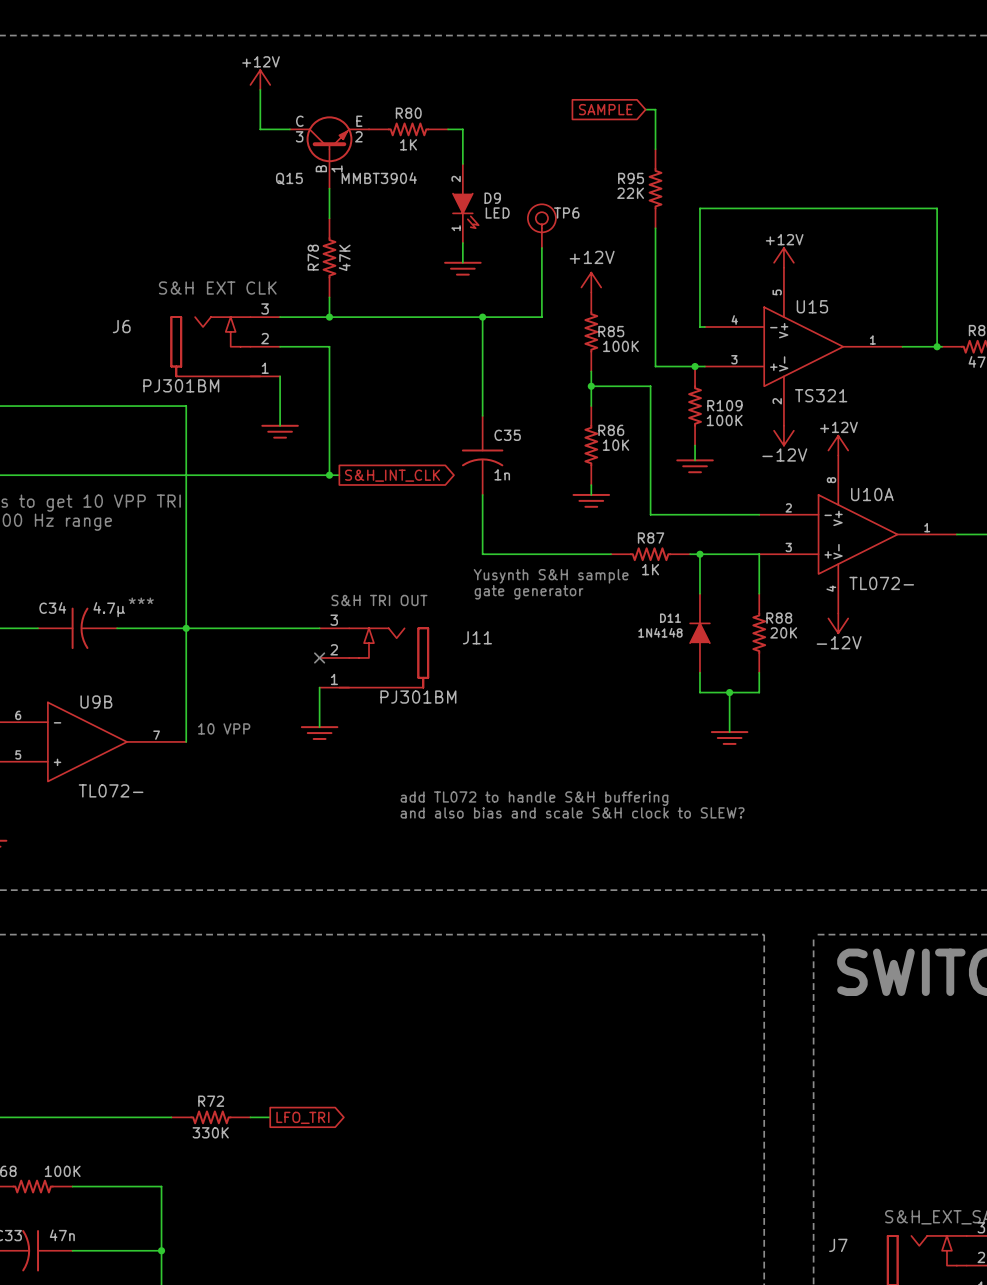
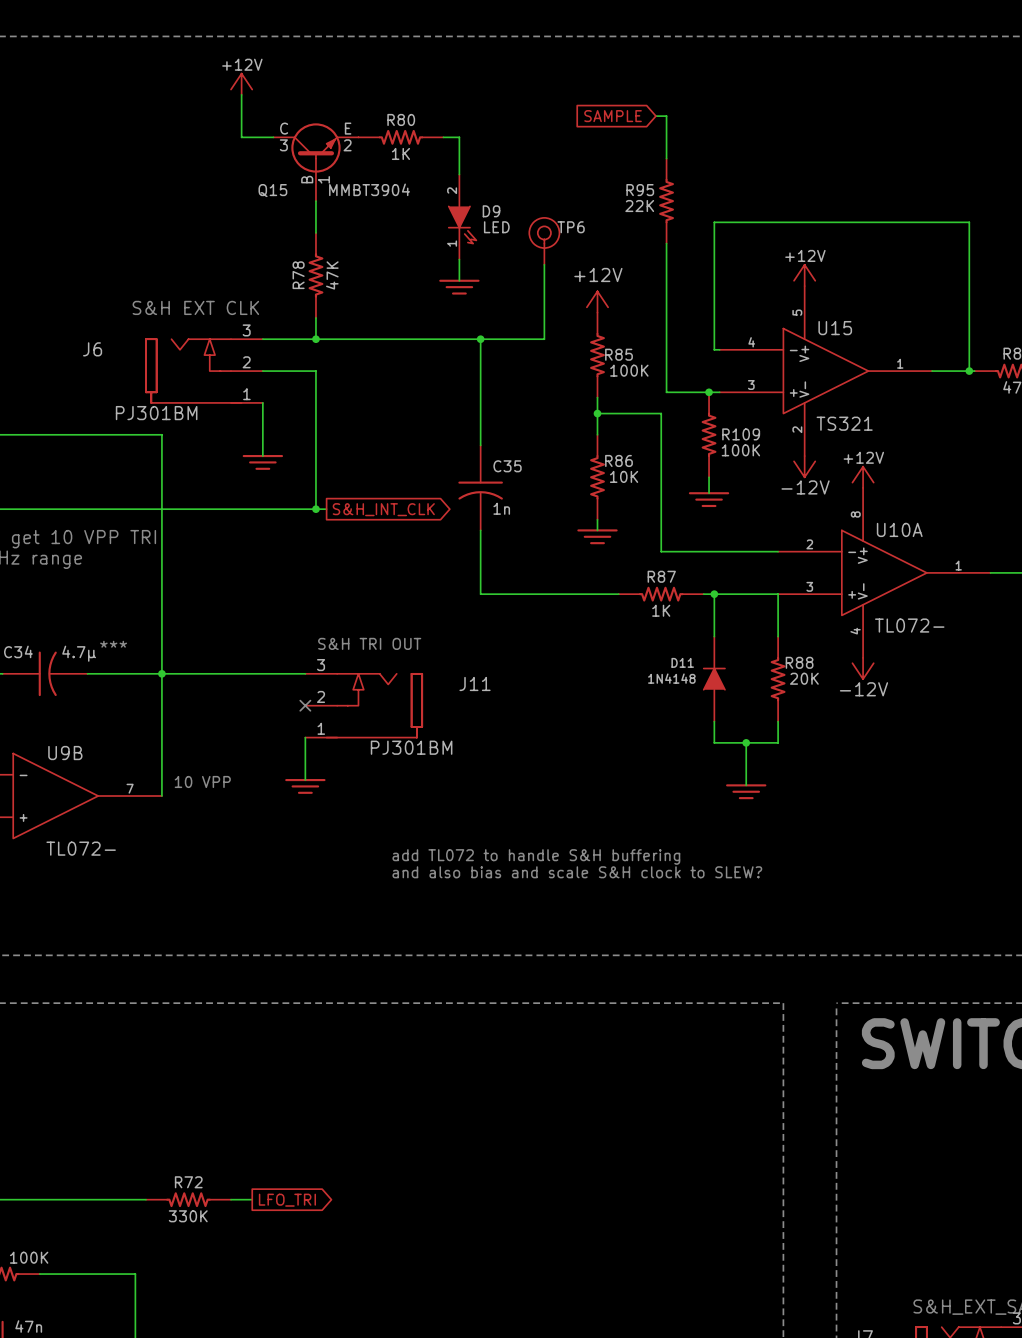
text: Yusynth S&H sample (551, 576) -> none
text: gate generator (529, 592) -> none

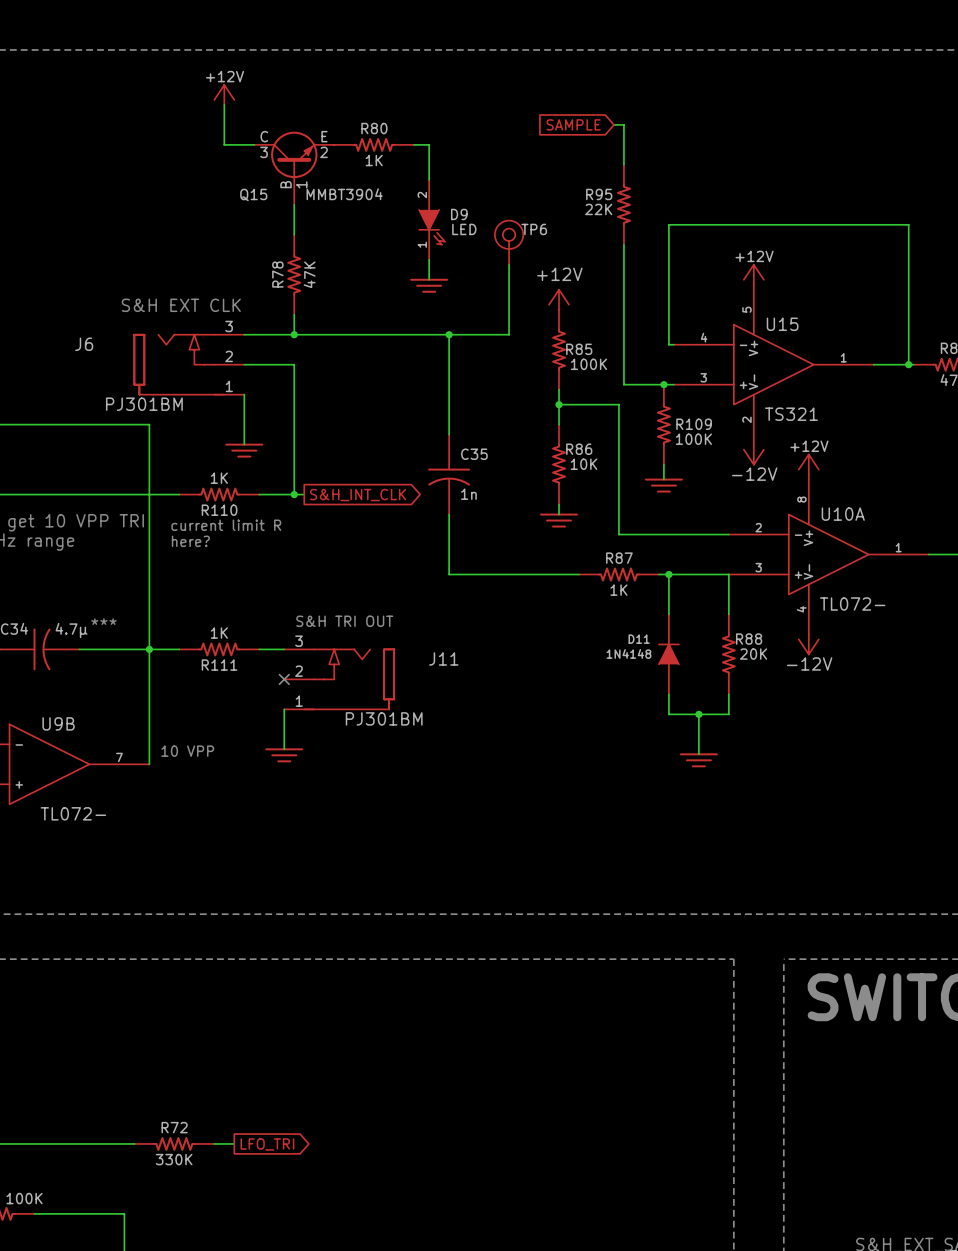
R110: none -> 1K (219, 494)
text: none -> current limit R (226, 525)
text: none -> here? (190, 541)
R111: none -> 1K (219, 649)
text: add TL072 to handle S&H buffering (536, 856) -> none
text: and also bias and scale S&H clock to SLEW? (577, 872) -> none

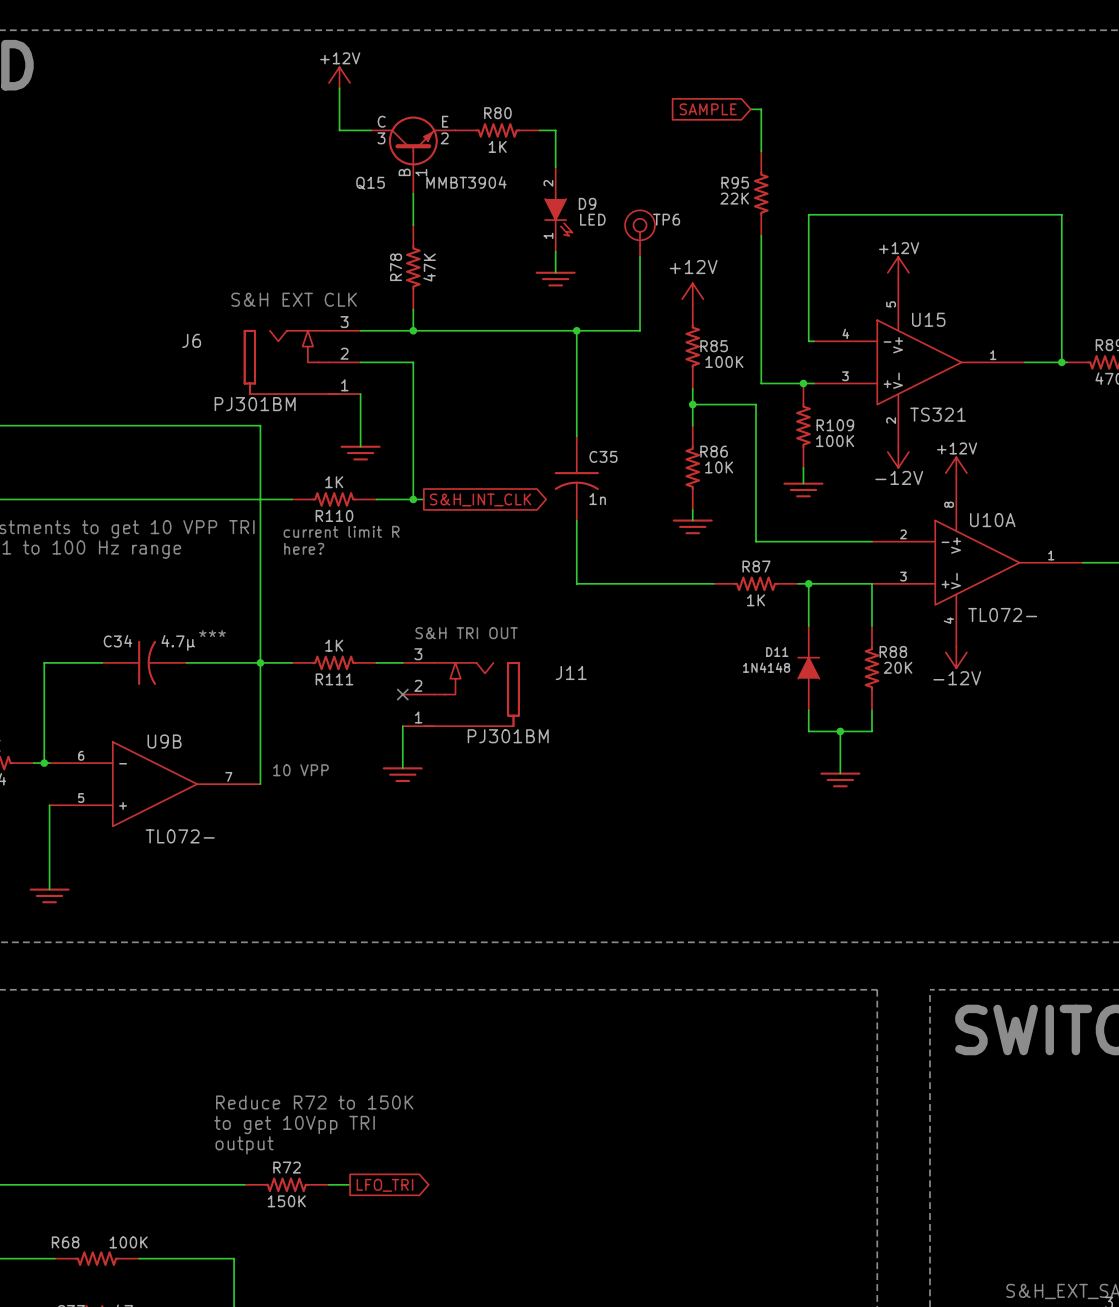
text: none -> Reduce R72 to 150K (314, 1102)
text: none -> to get 10Vpp TRI (294, 1125)
text: none -> output (244, 1145)
R72 value: 330K (174, 1159) -> 150K (286, 1201)

